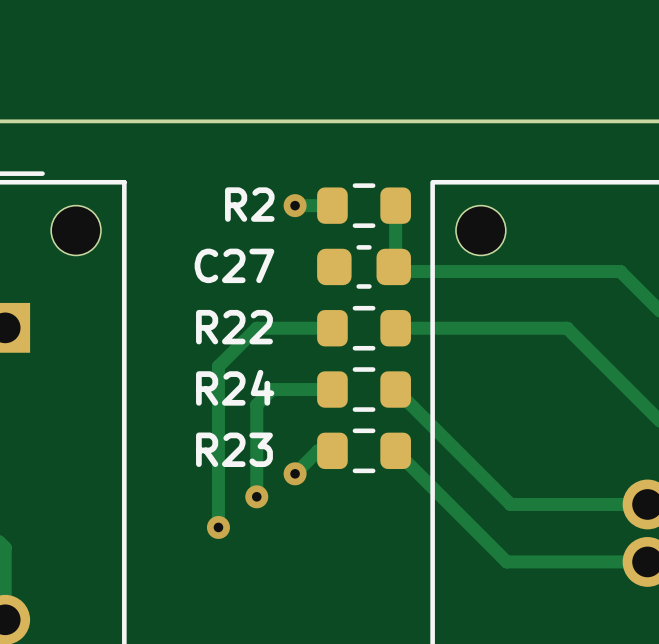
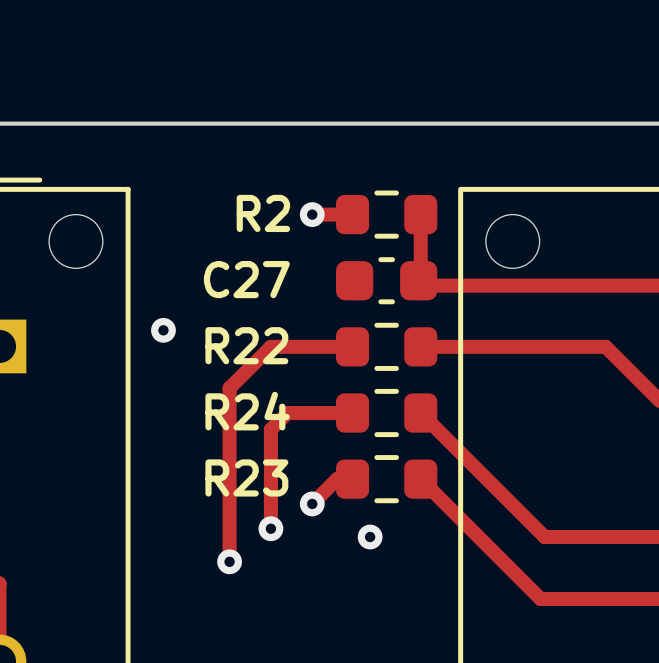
via: none -> (163, 330)
via: none -> (370, 537)

